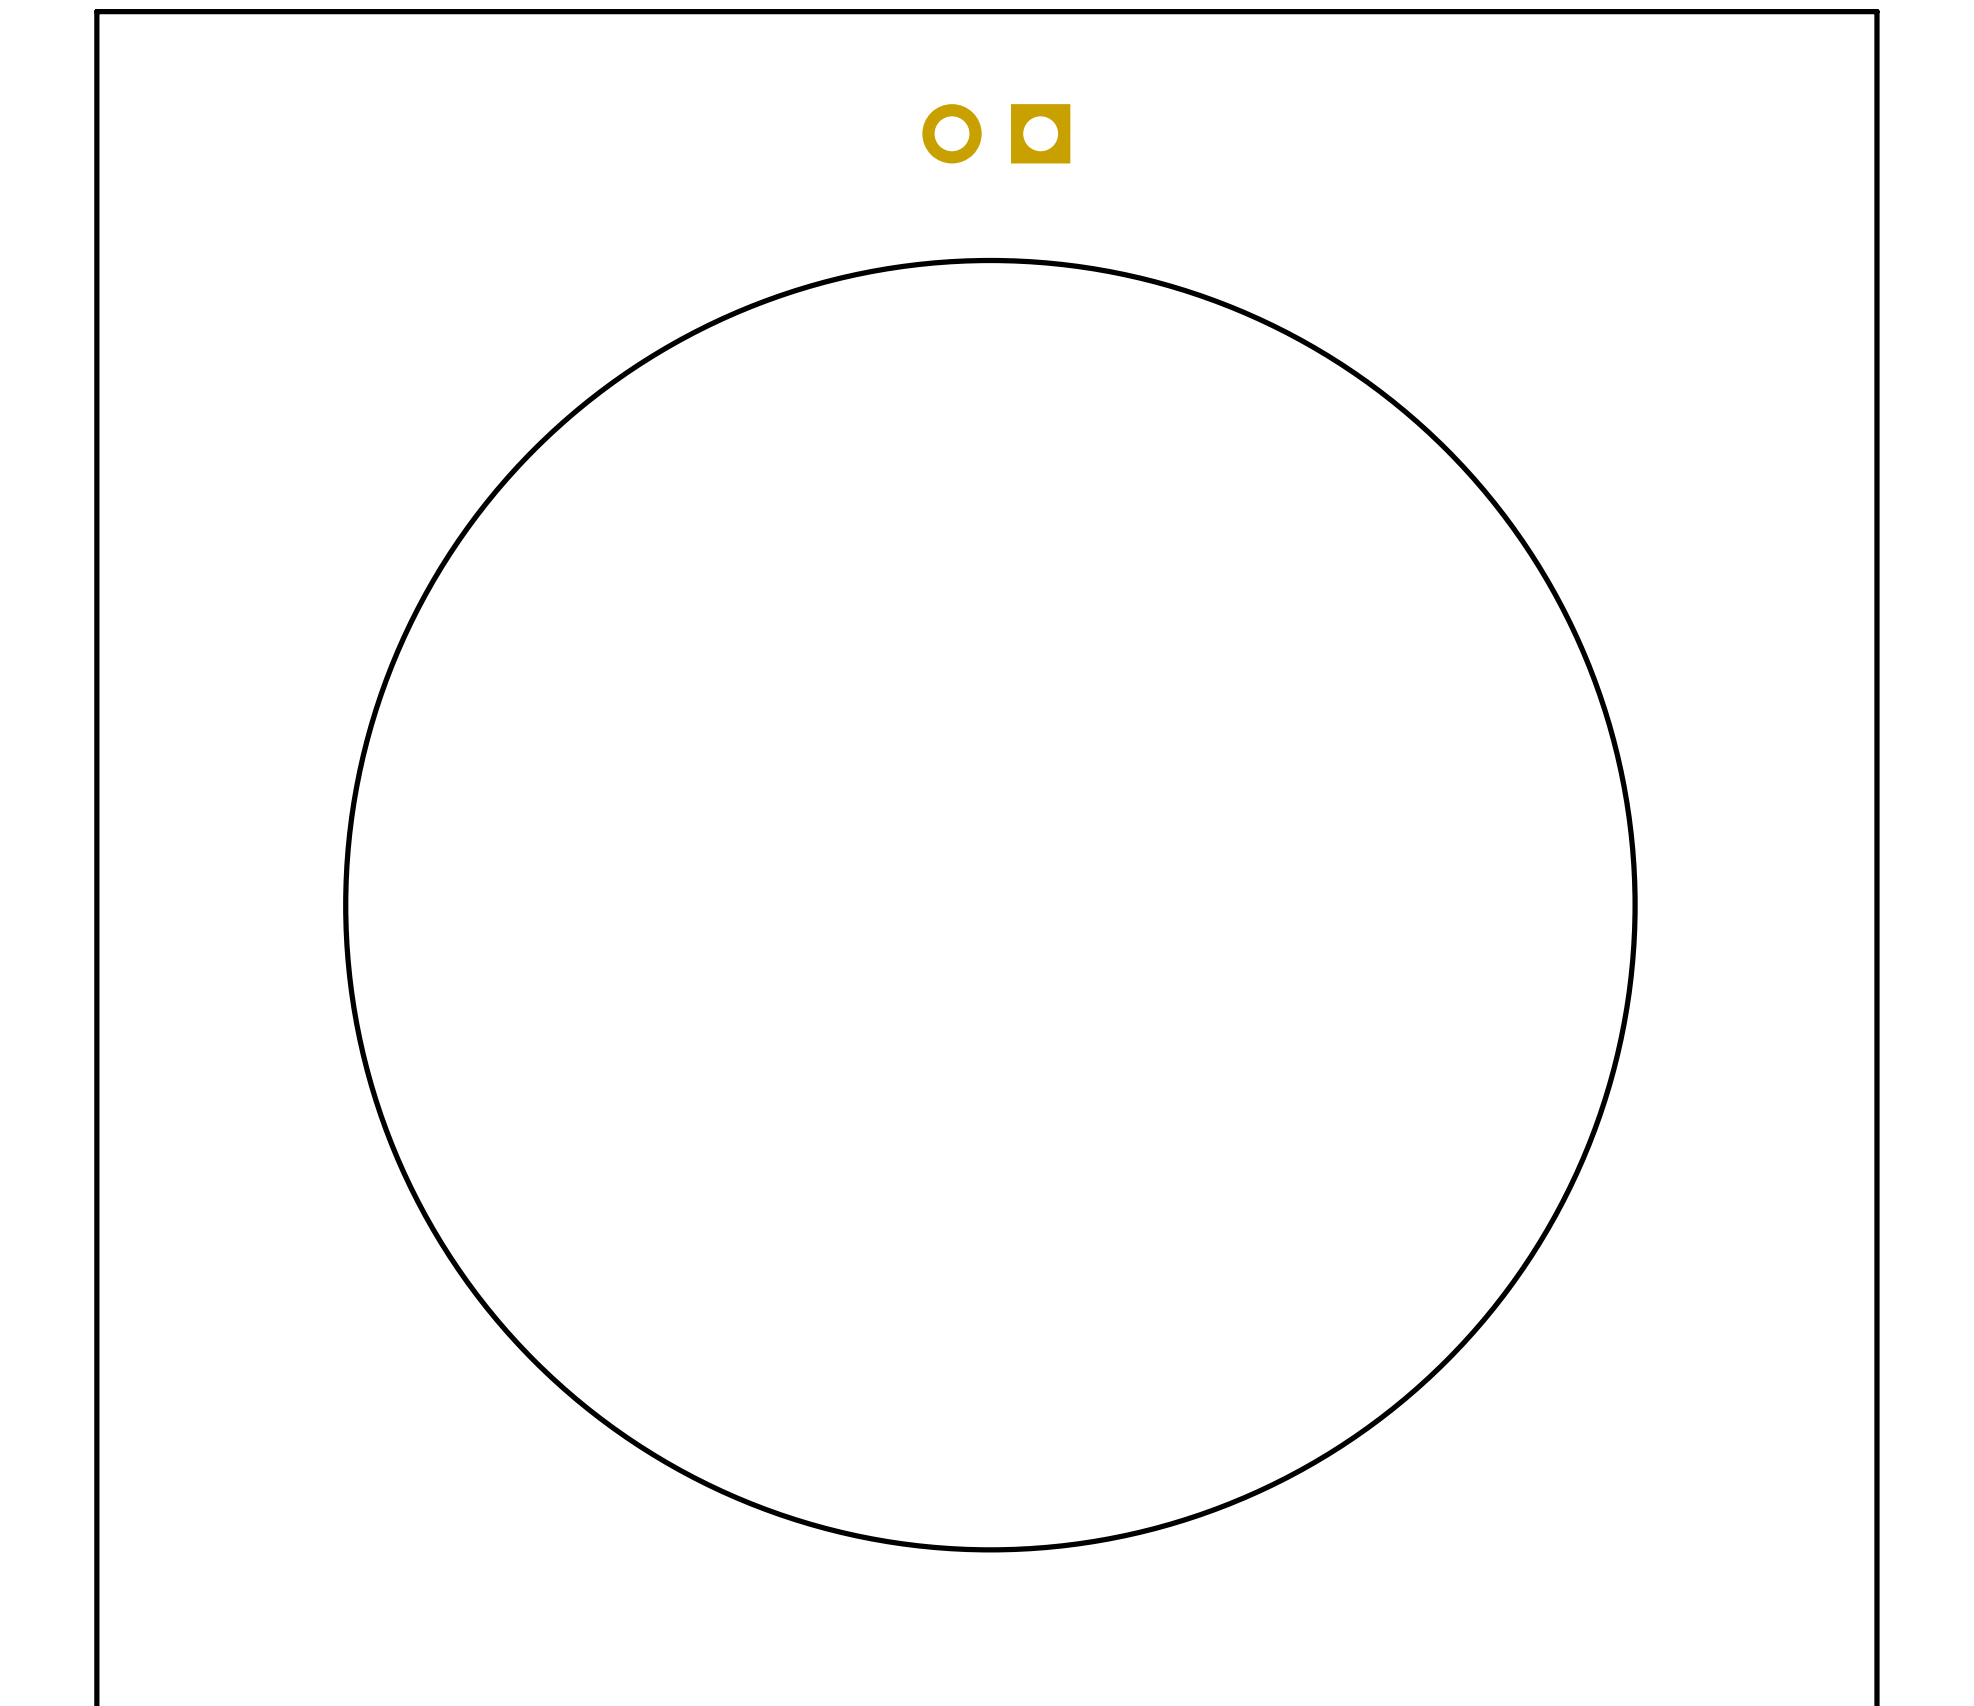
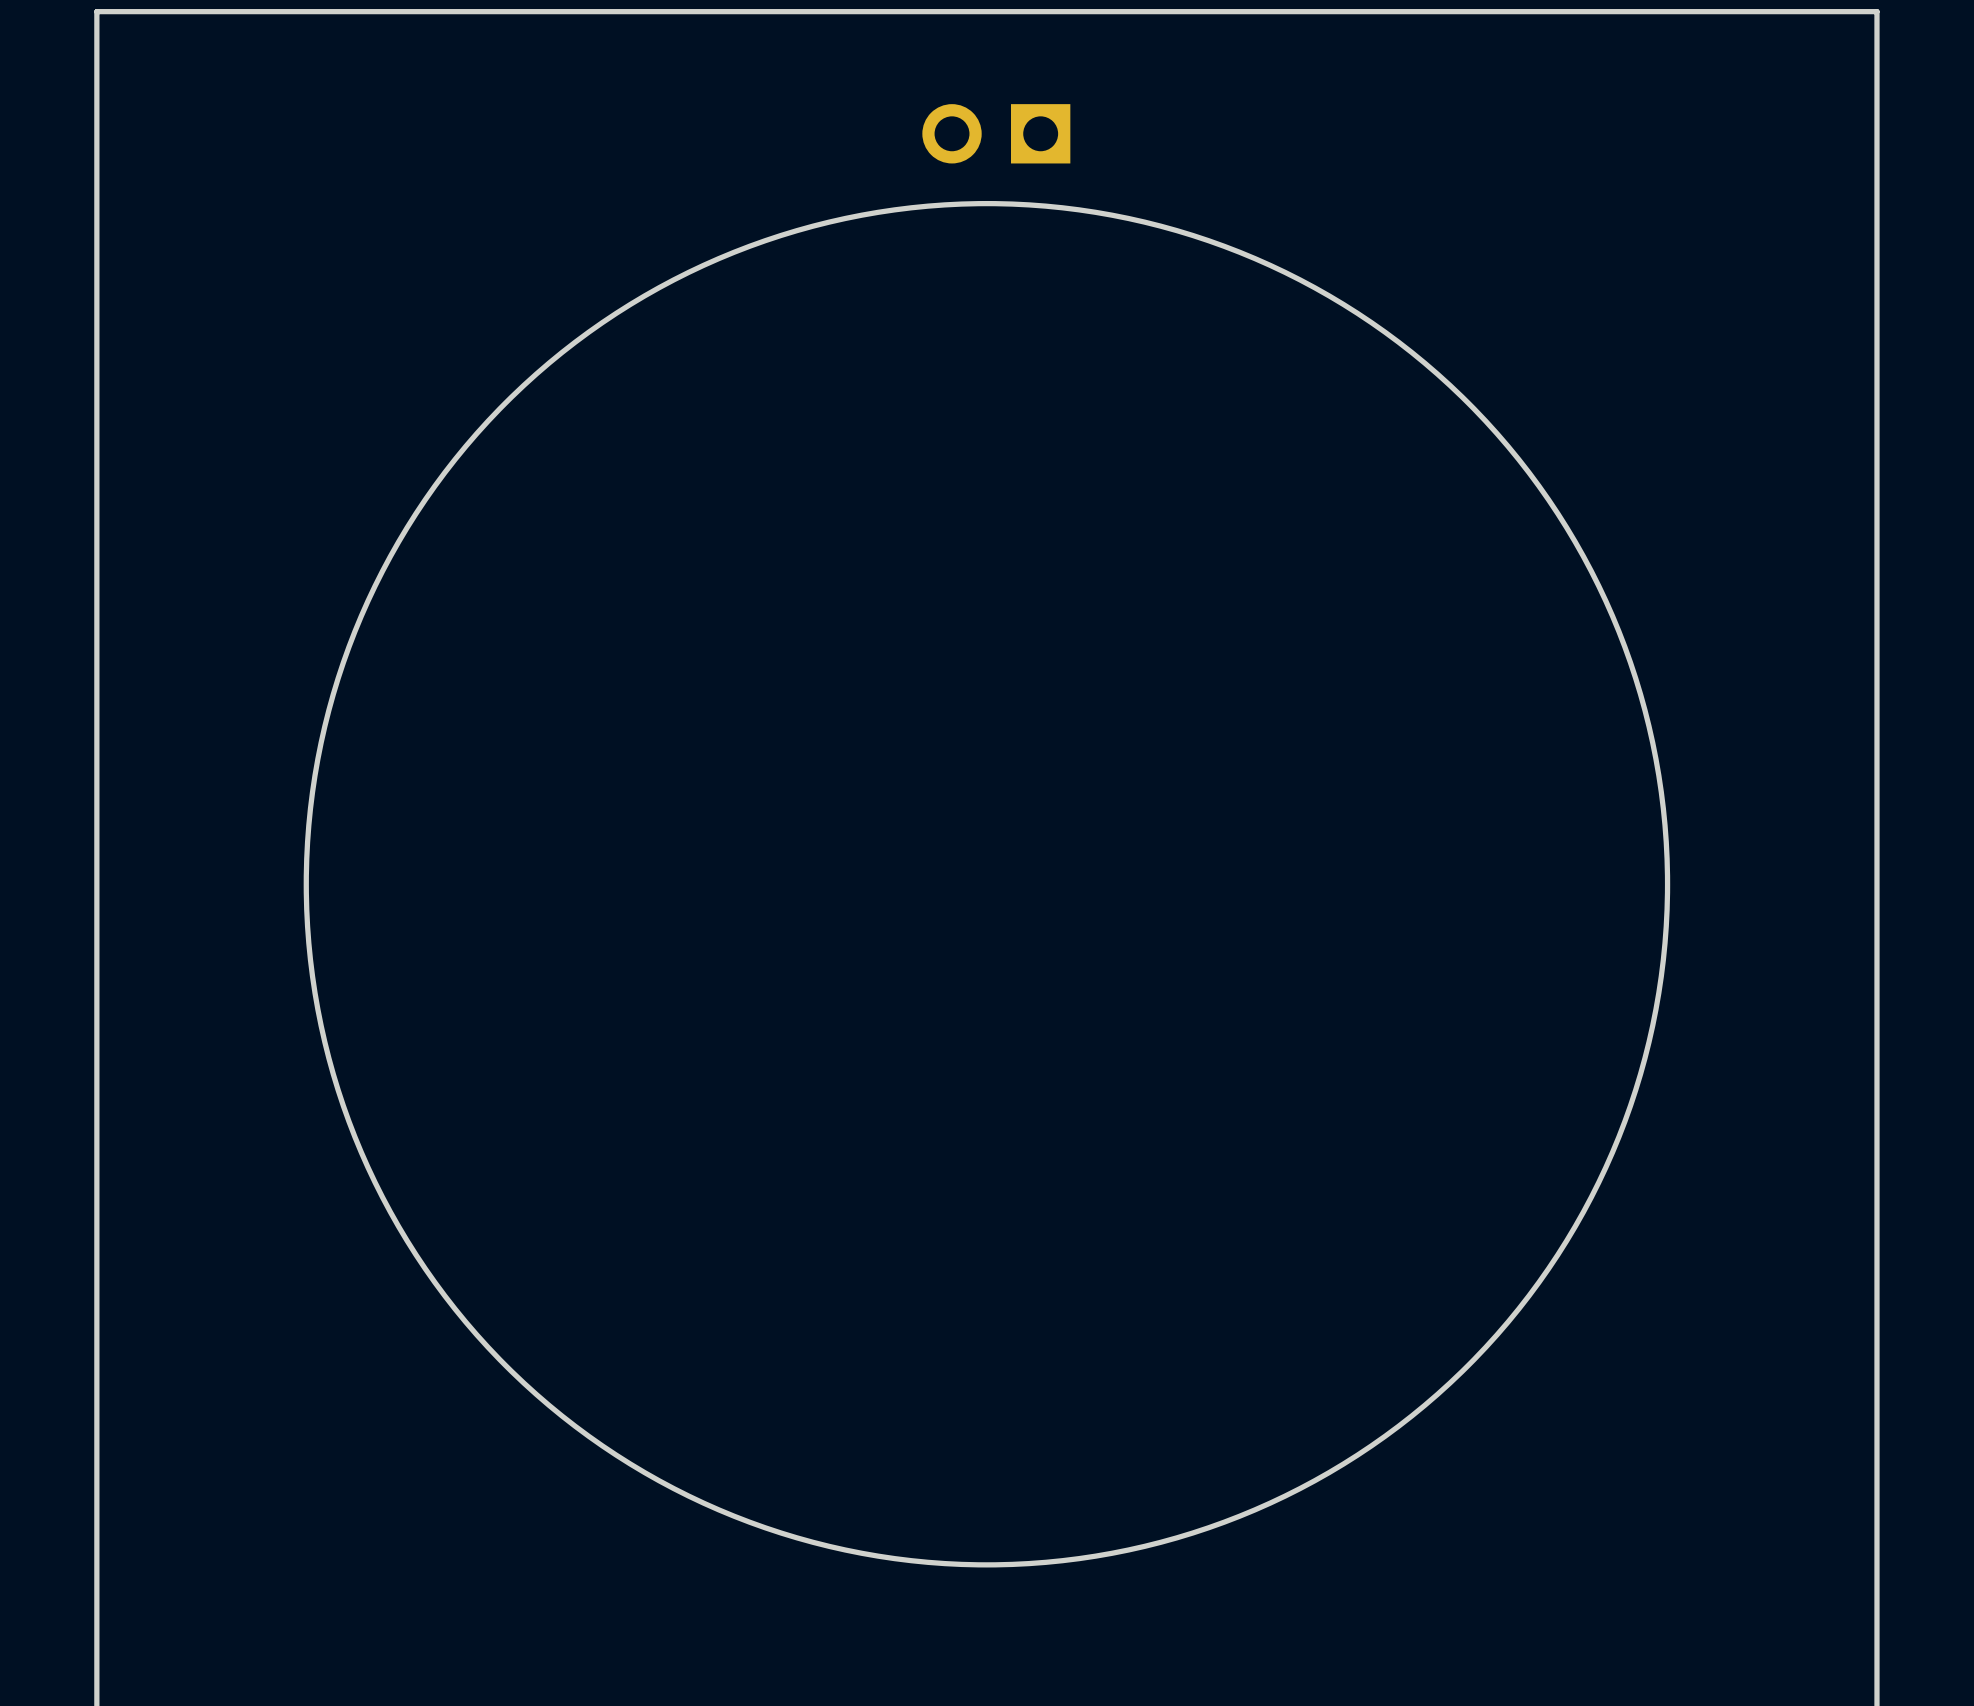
round board edge size: [343, 257, 1638, 1553] -> [303, 200, 1671, 1568]

